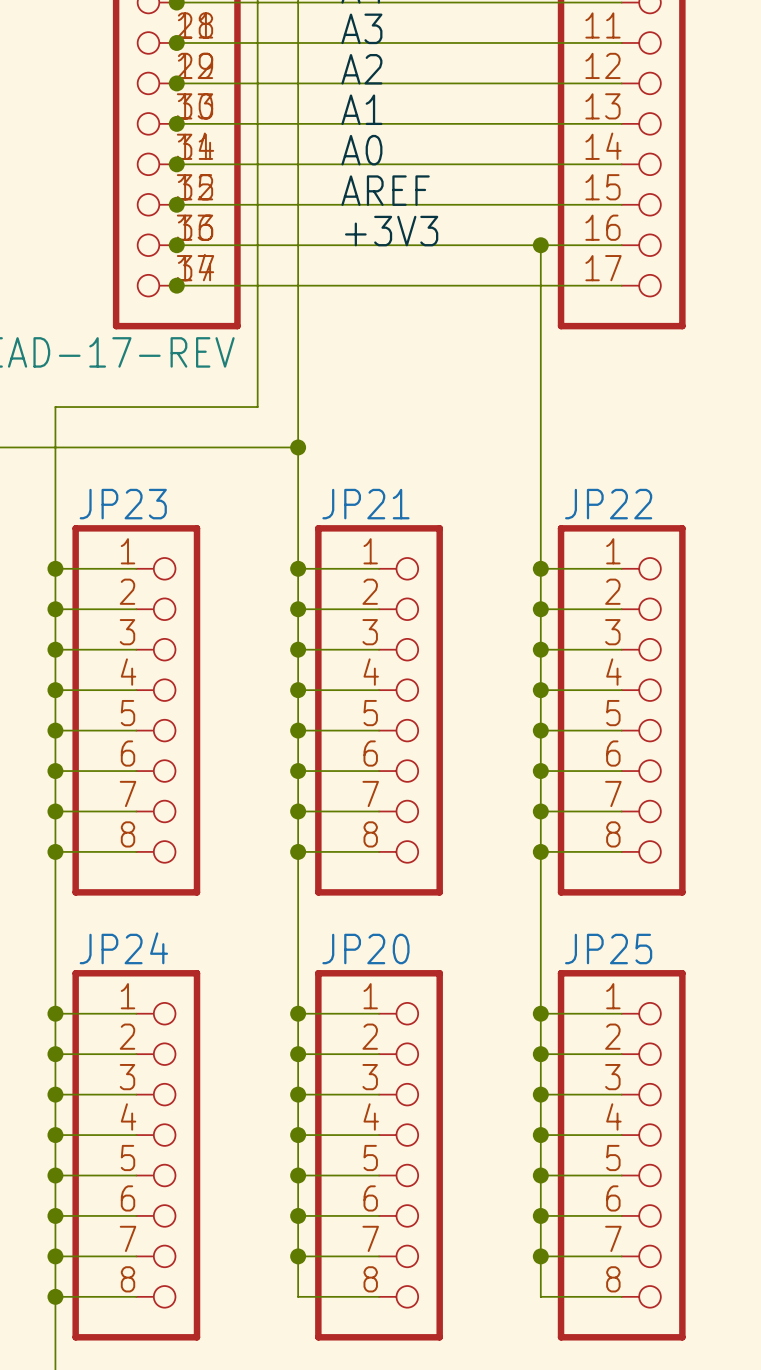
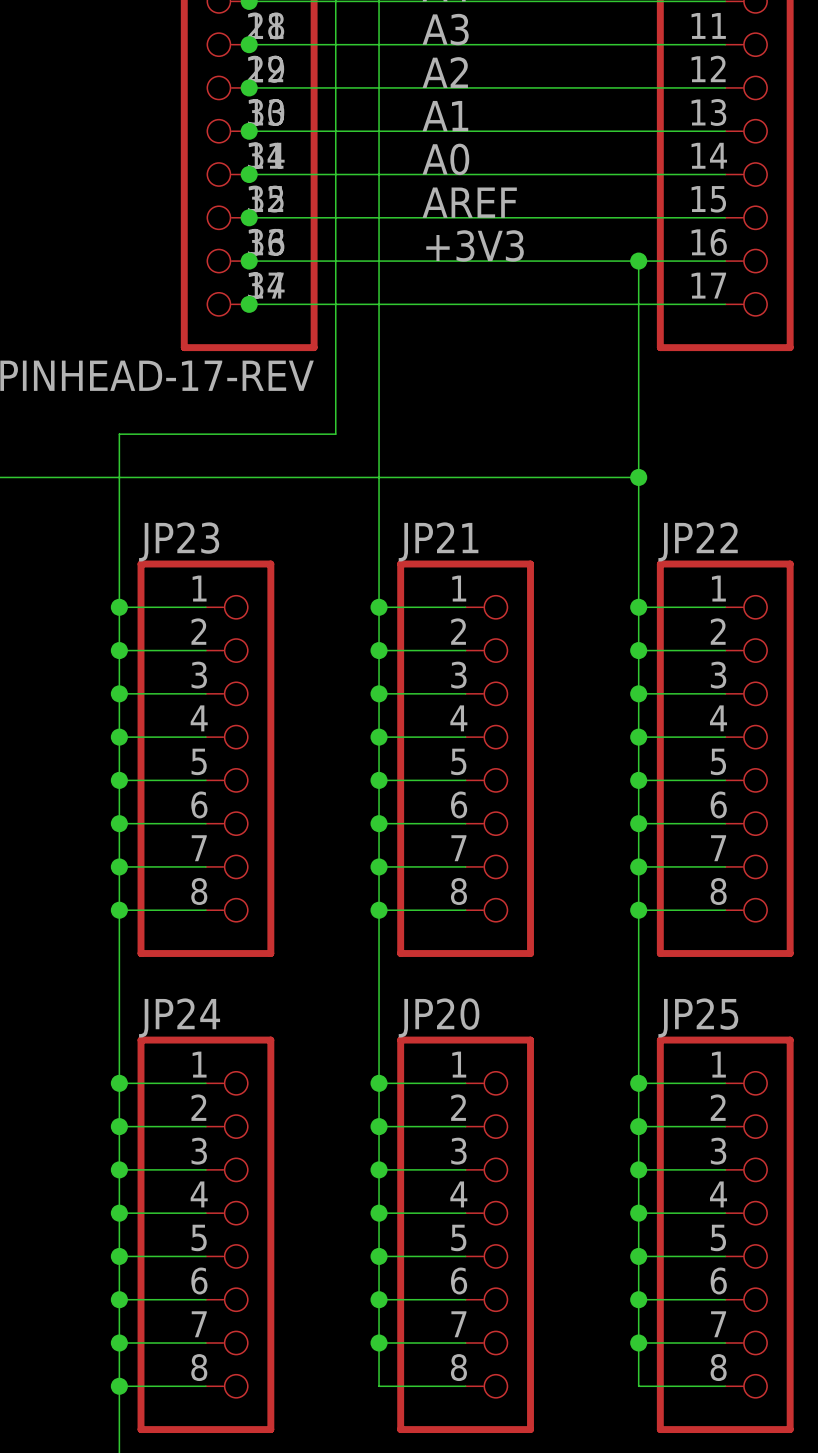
wire: none -> (379, 477) (638, 477)
junction: (298, 447) -> none
junction: none -> (638, 477)

